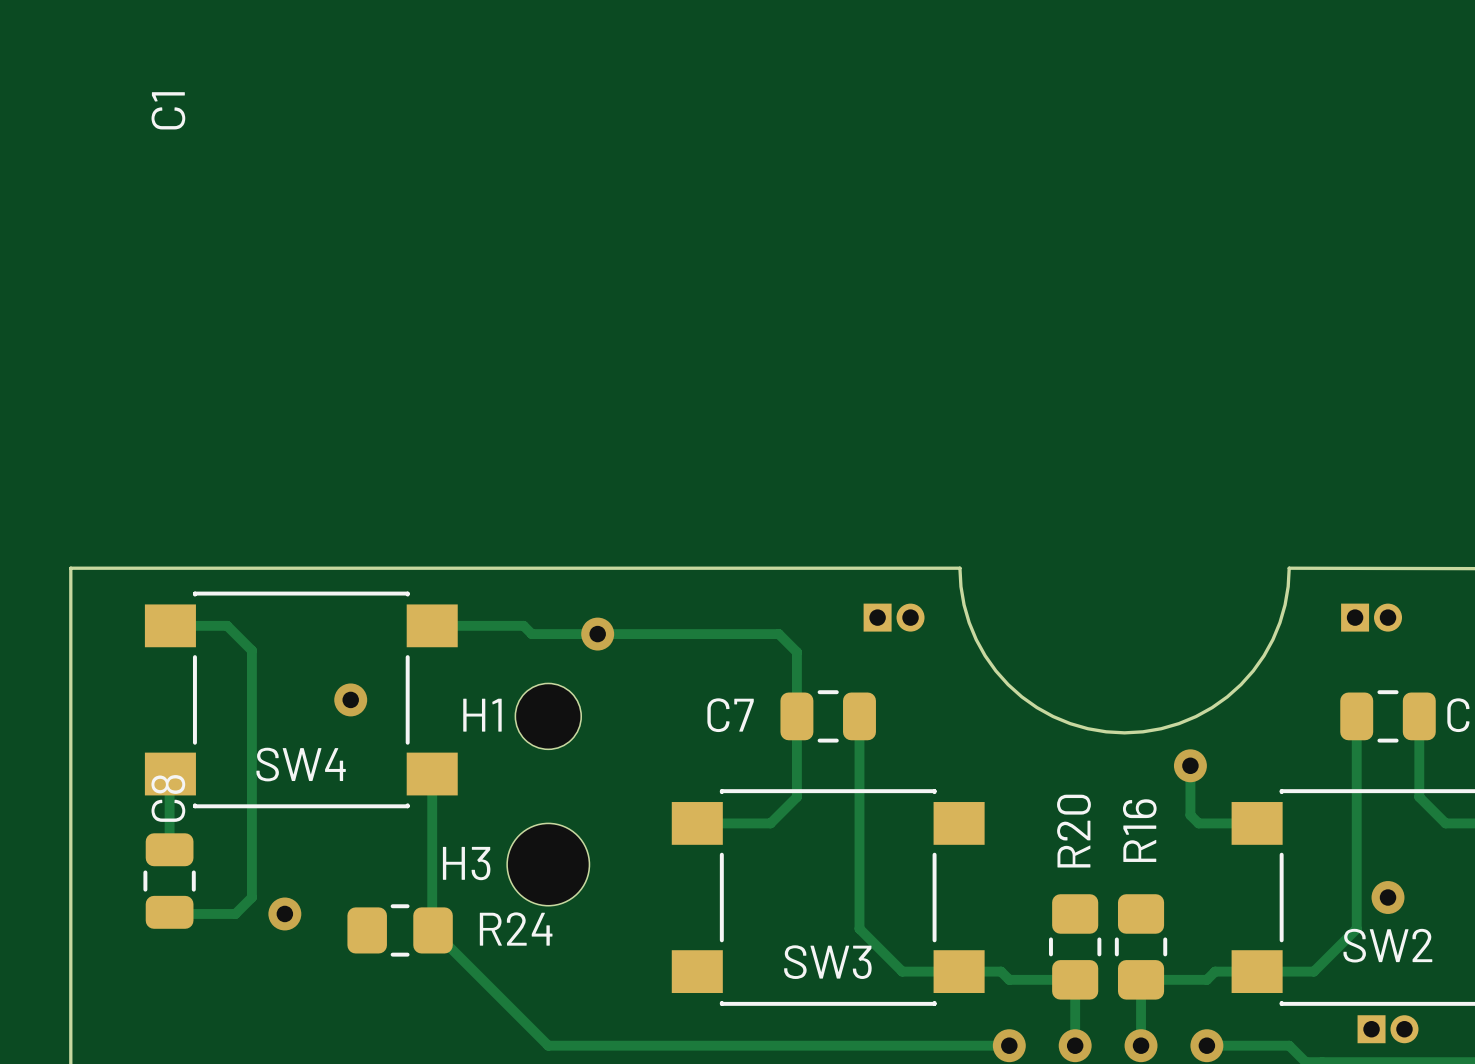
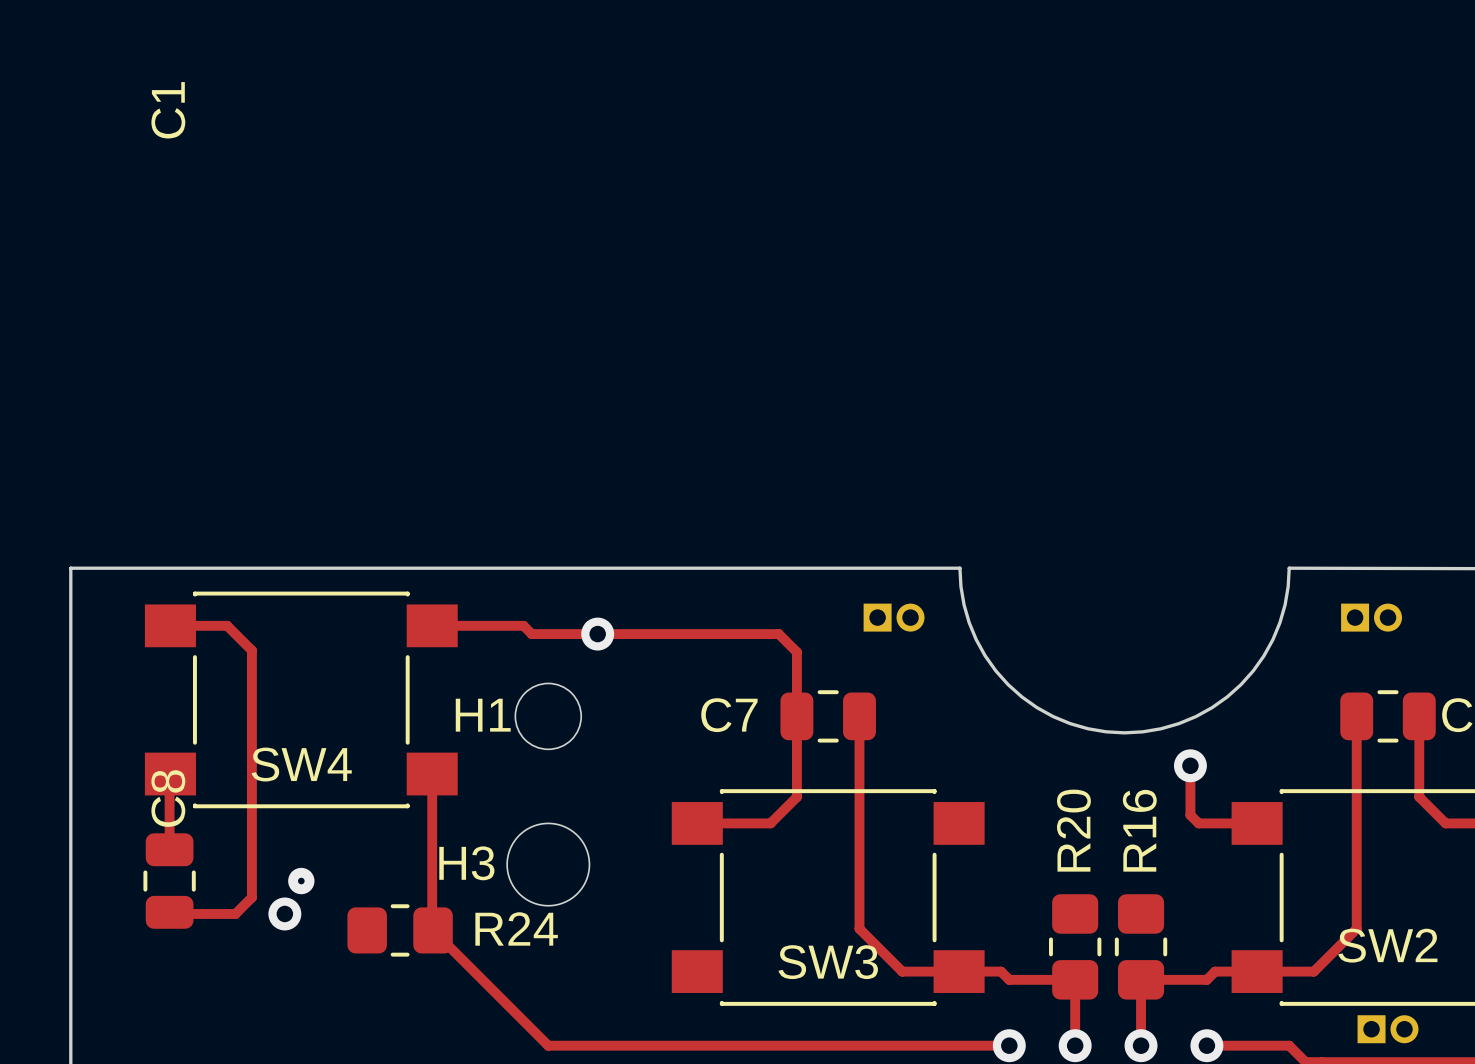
via: (350, 699) -> none
via: none -> (301, 881)
via: (1388, 897) -> none

